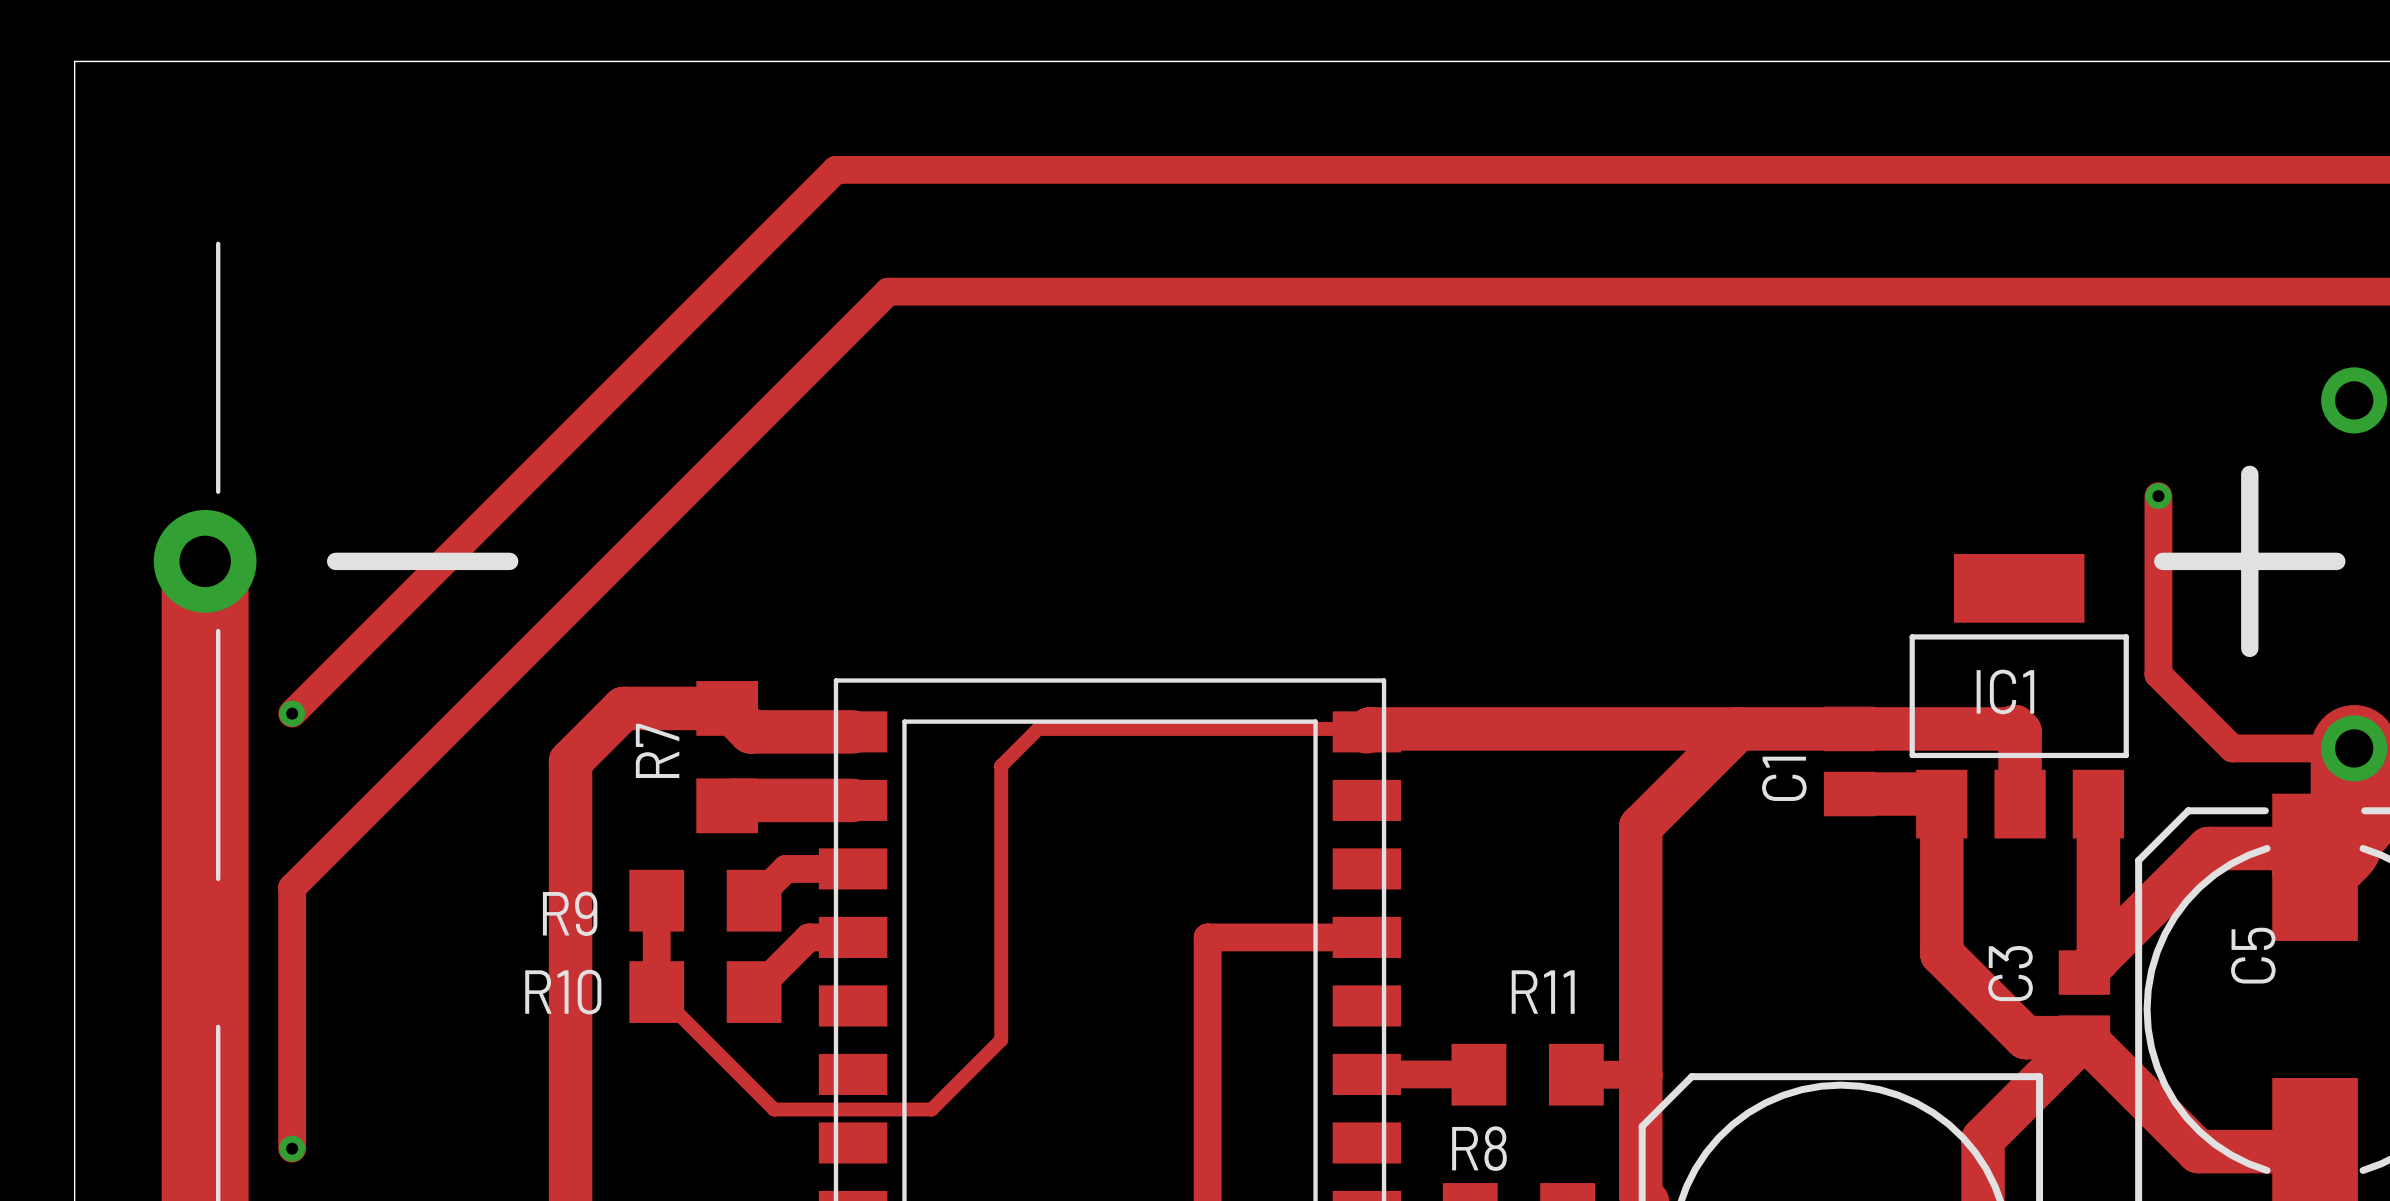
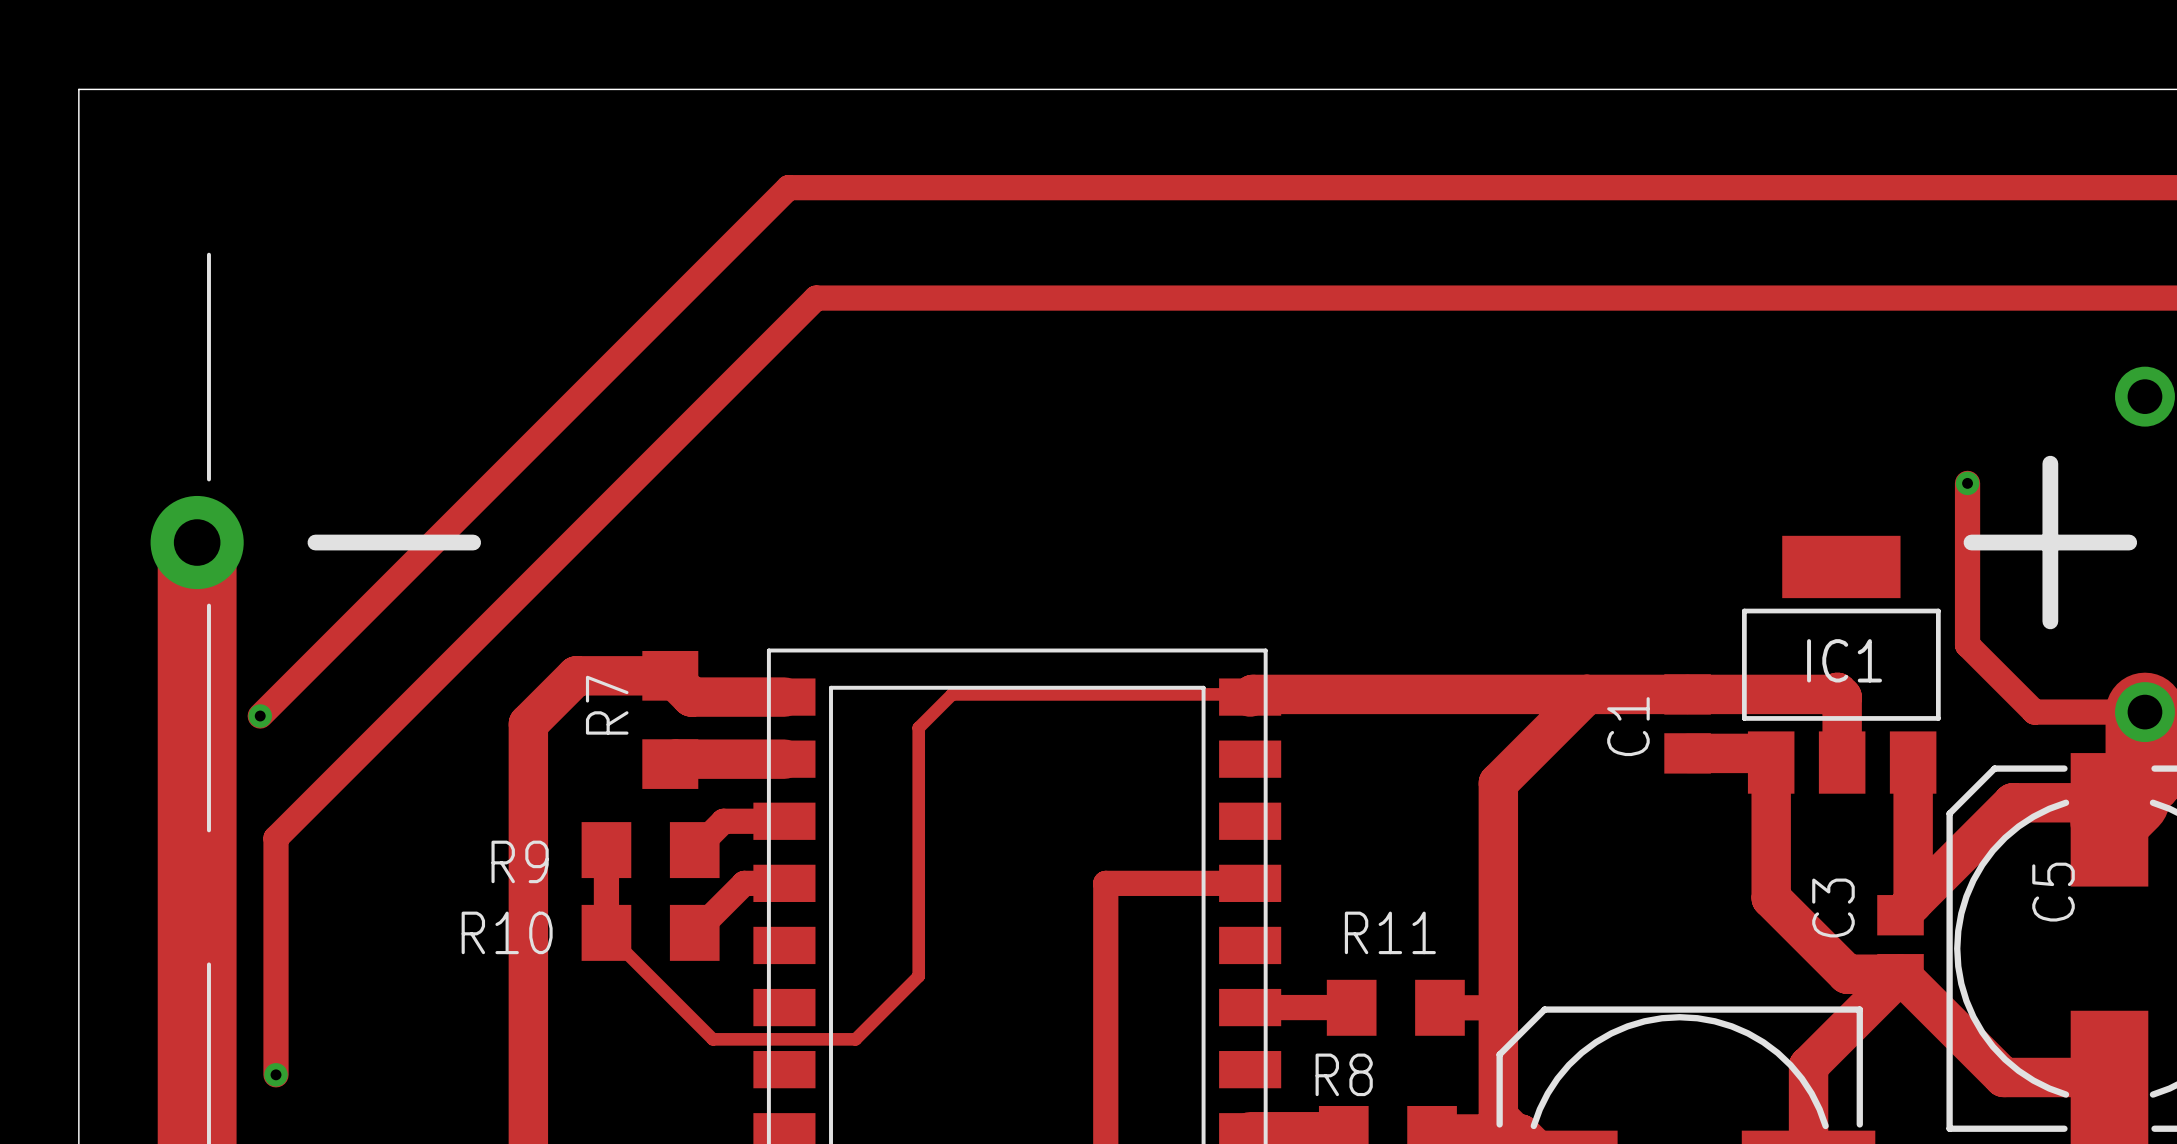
track: (857, 169) (835, 169) (292, 713) -> (788, 187) (260, 716)
via position: (292, 713) -> (260, 716)

